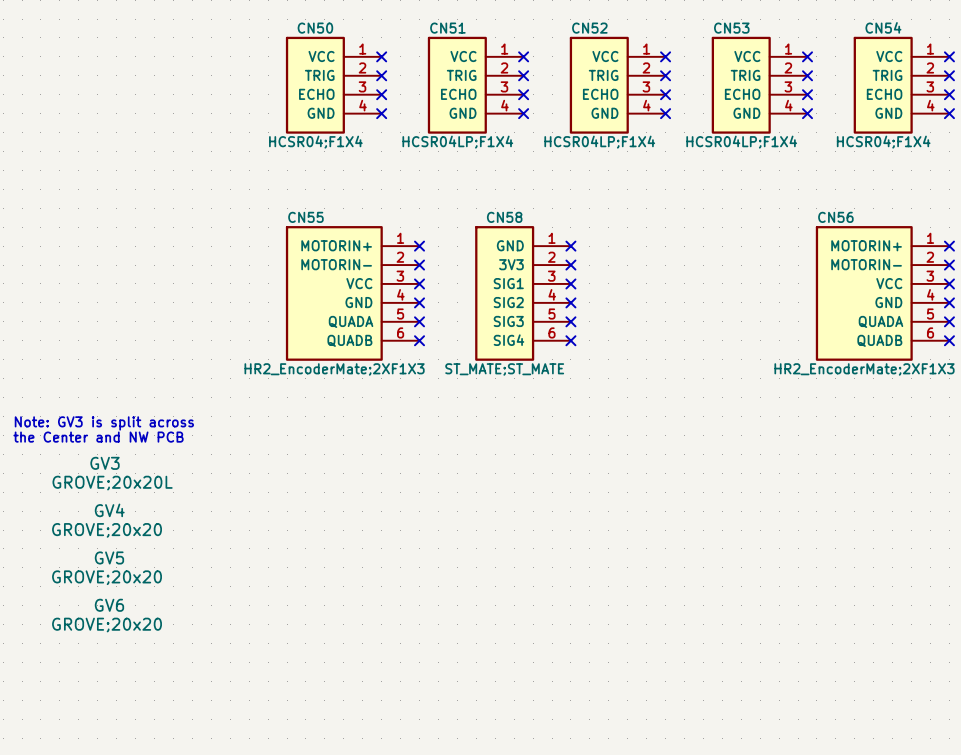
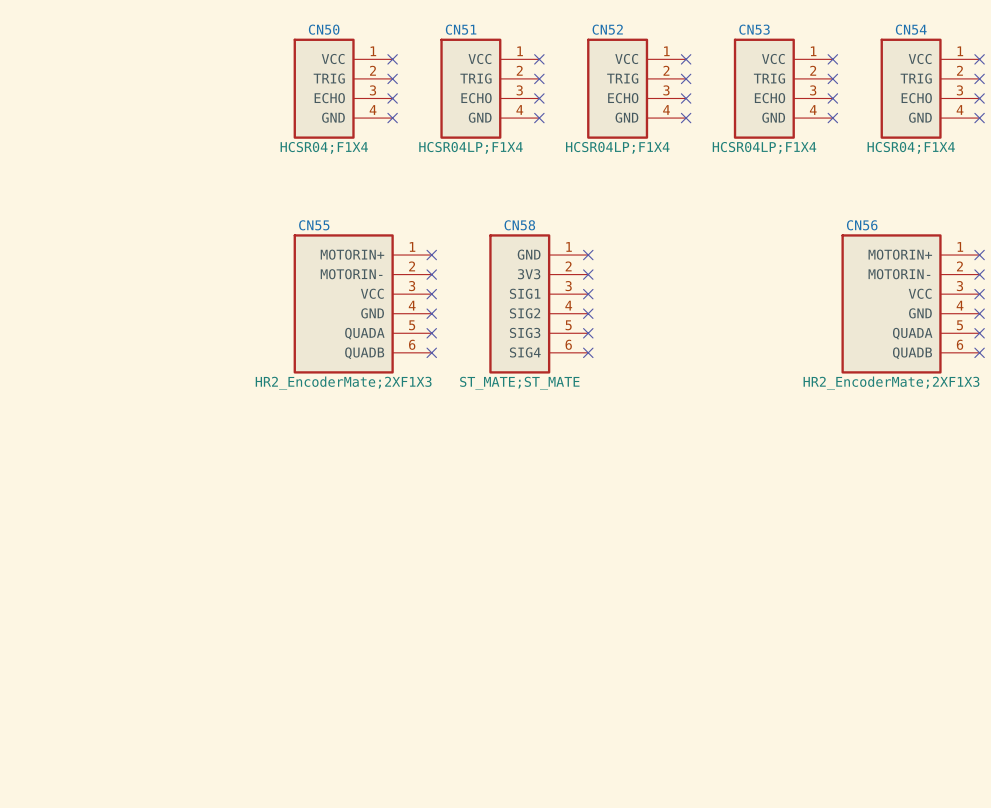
text: Note: GV3 is split across (104, 423) -> none
text: the Center and NW PCB (98, 437) -> none
GV3: GROVE;20x20L (112, 473) -> none
GV4: GROVE;20x20 (107, 520) -> none
GV5: GROVE;20x20 (107, 568) -> none
GV6: GROVE;20x20 (107, 615) -> none

